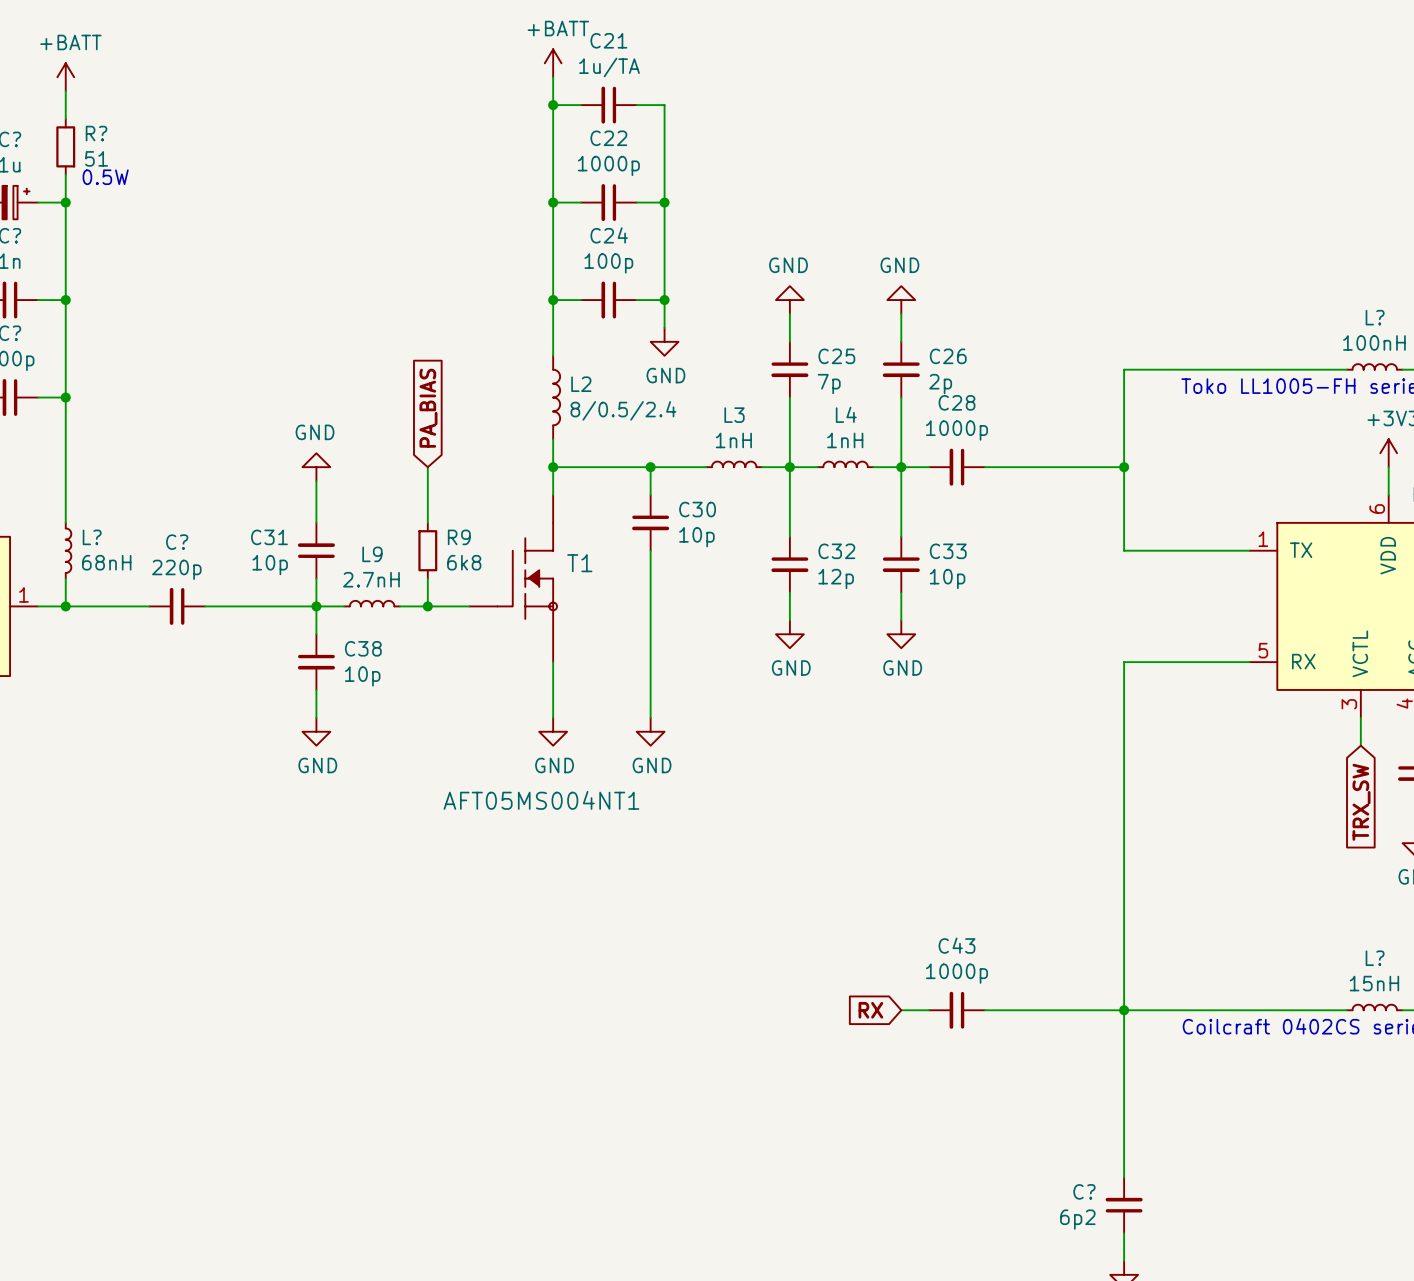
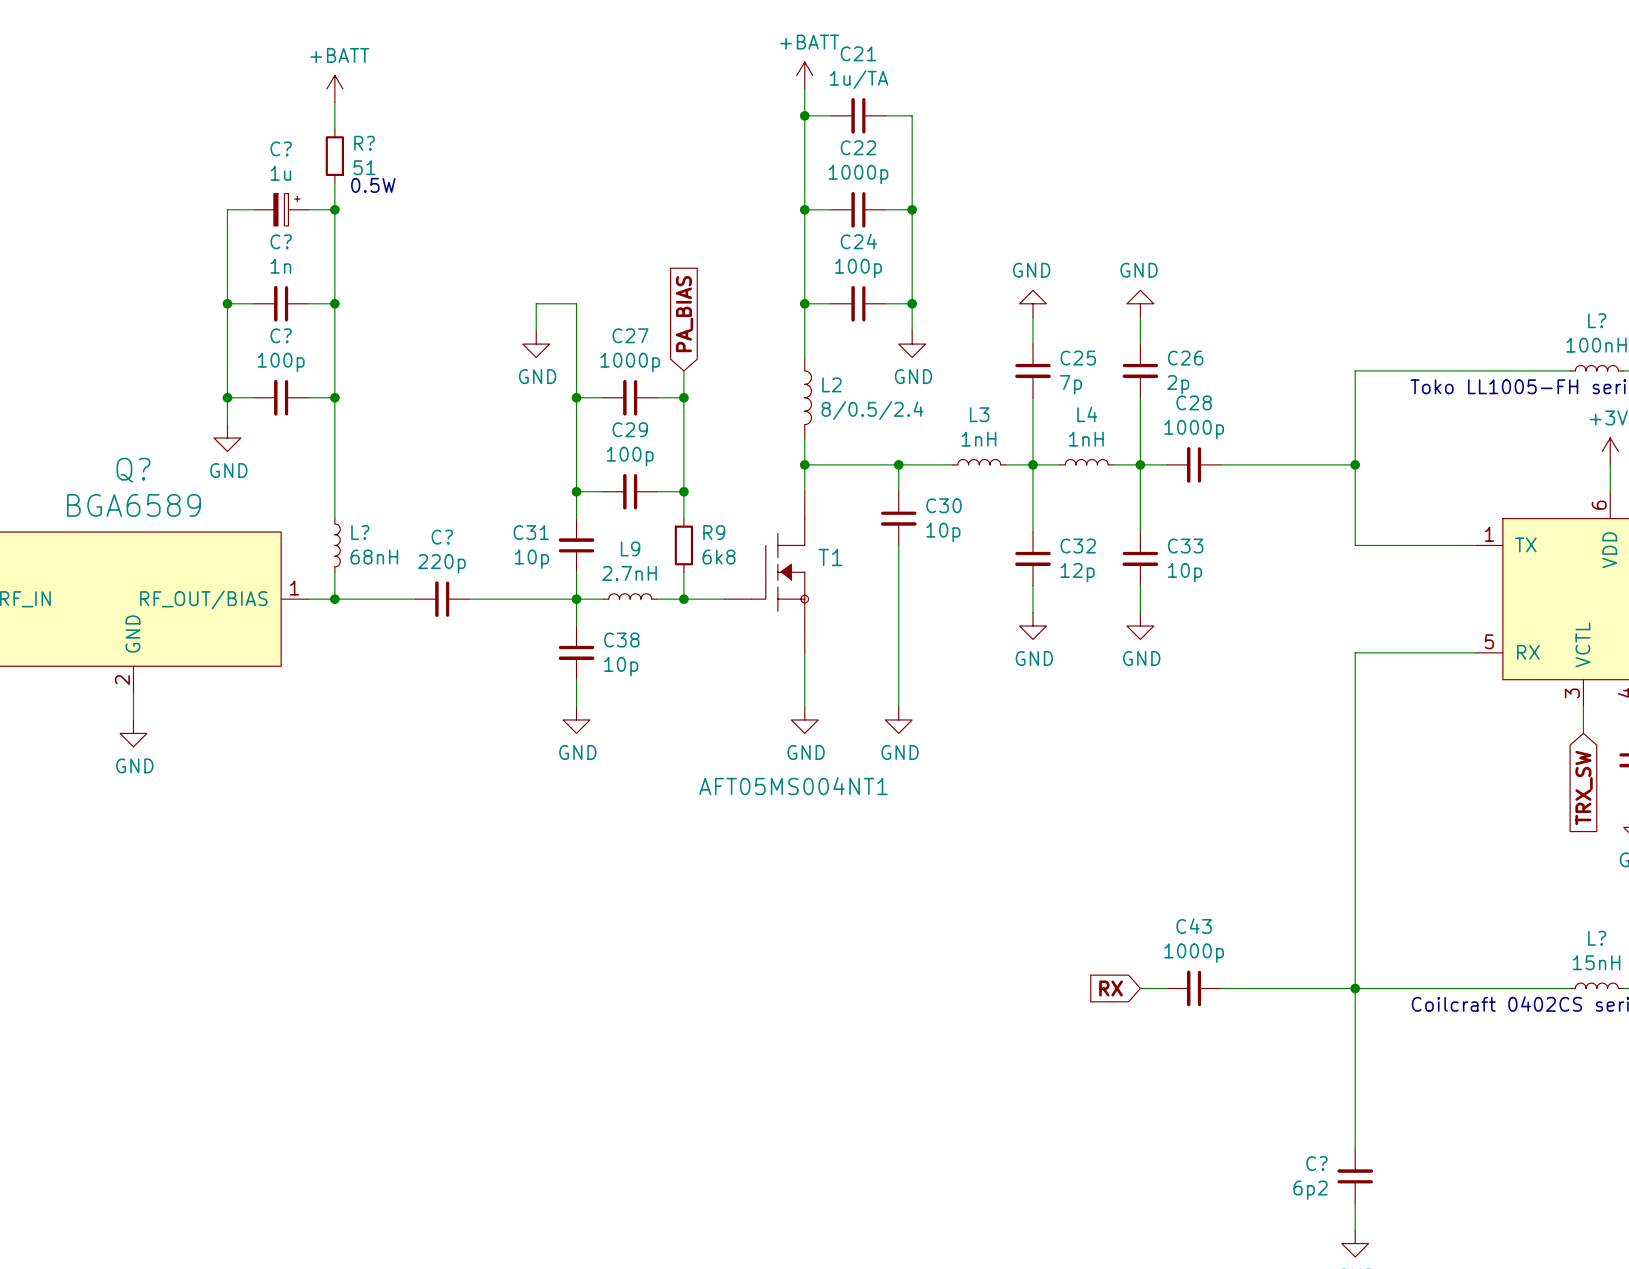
wire: none -> (536, 330) (536, 303) (576, 303) (576, 478)
wire: none -> (683, 370) (683, 464)
wire: none -> (576, 397) (603, 397)
junction: none -> (576, 397)
C27: none -> 1000p (630, 397)
wire: none -> (657, 397) (683, 397)
junction: none -> (683, 397)
global label position: PA_BIAS (428, 408) -> PA_BIAS (684, 314)
power symbol rotation: 0° (316, 467) -> 180° (536, 344)
power symbol position: GND (316, 467) -> GND (536, 344)
wire: none -> (576, 491) (603, 491)
junction: none -> (576, 491)
C29: none -> 100p (630, 491)
wire: none -> (657, 491) (683, 491)
junction: none -> (683, 491)

